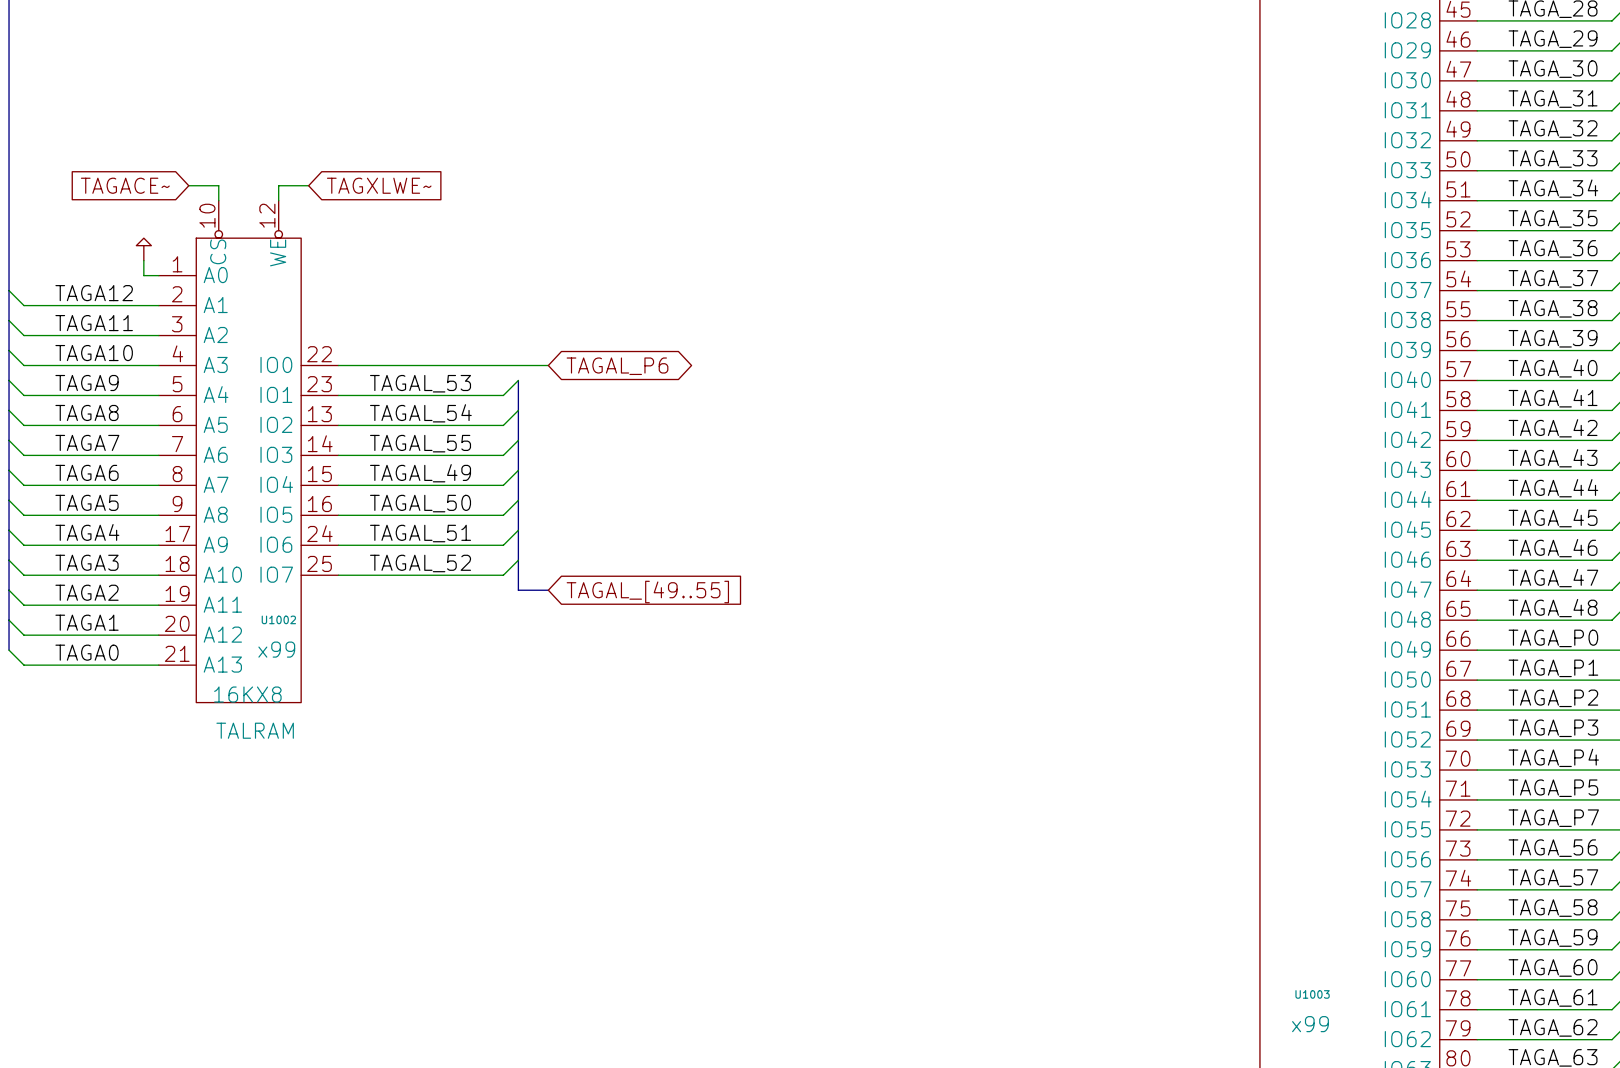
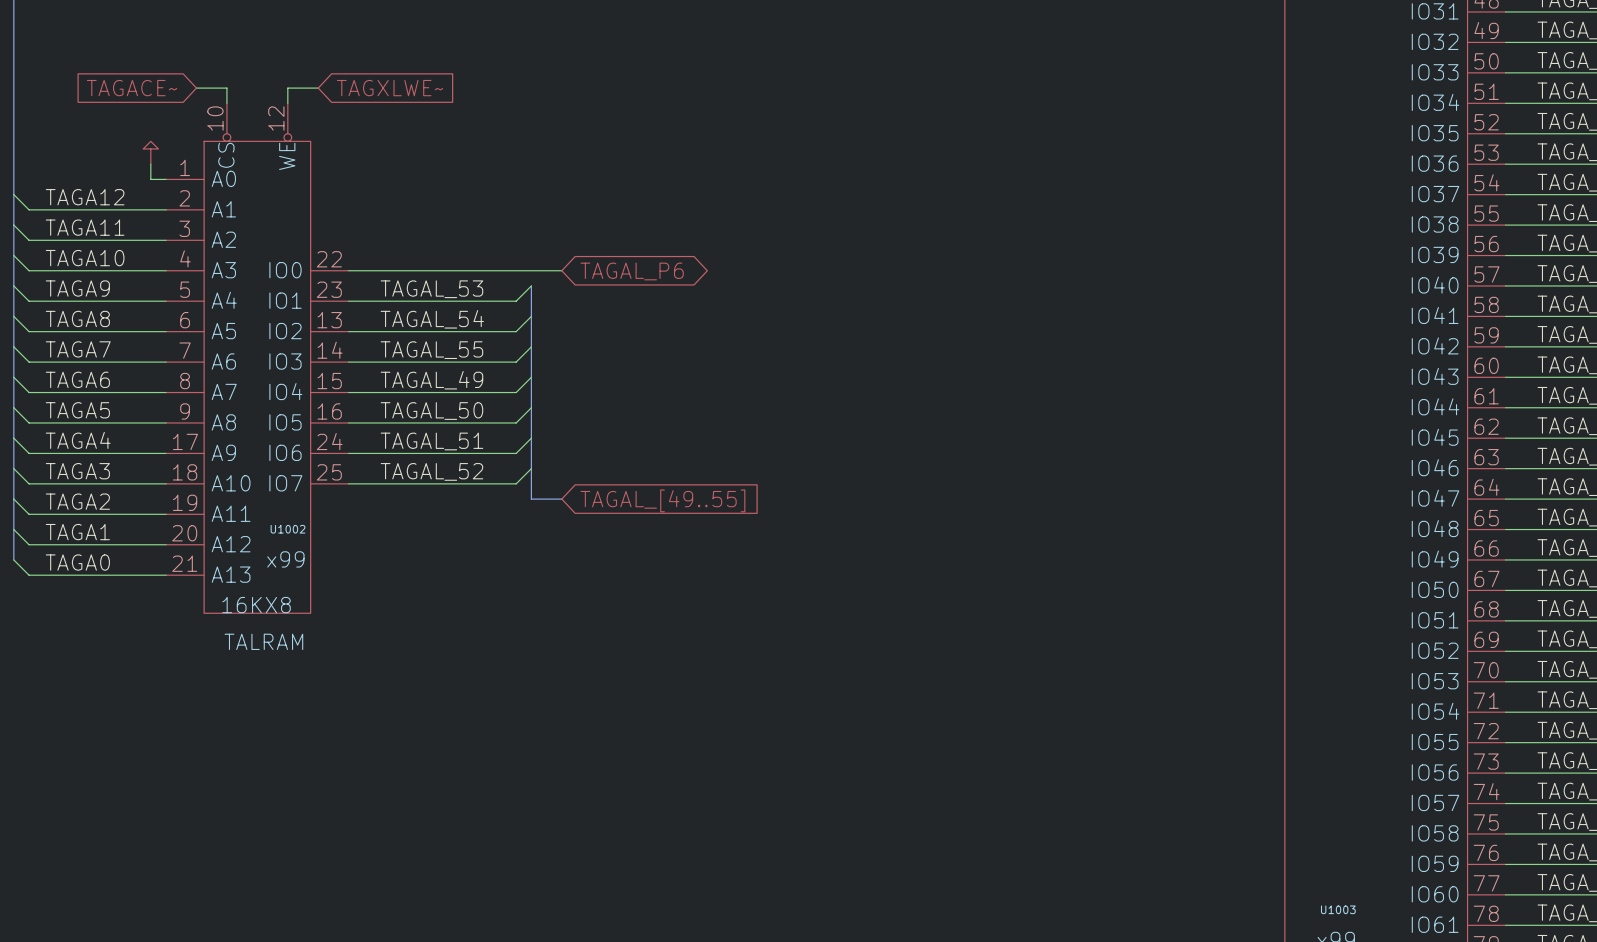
label position: TAGA12 (94, 293) -> TAGA12 (85, 197)
label position: TAGA11 (94, 323) -> TAGA11 (85, 227)
label position: TAGA10 (94, 353) -> TAGA10 (85, 258)
label position: TAGA9 (87, 383) -> TAGA9 (77, 288)
label position: TAGA8 (87, 412) -> TAGA8 (77, 318)
label position: TAGA7 (87, 442) -> TAGA7 (78, 349)
label position: TAGA6 (87, 472) -> TAGA6 (77, 379)
label position: TAGA5 (87, 502) -> TAGA5 (77, 410)
label position: TAGA4 (87, 532) -> TAGA4 (78, 440)
label position: TAGA3 (87, 562) -> TAGA3 (77, 471)
label position: TAGA2 (87, 592) -> TAGA2 (77, 501)
label position: TAGA1 (87, 622) -> TAGA1 (77, 532)
label position: TAGA0 (87, 652) -> TAGA0 (77, 562)

